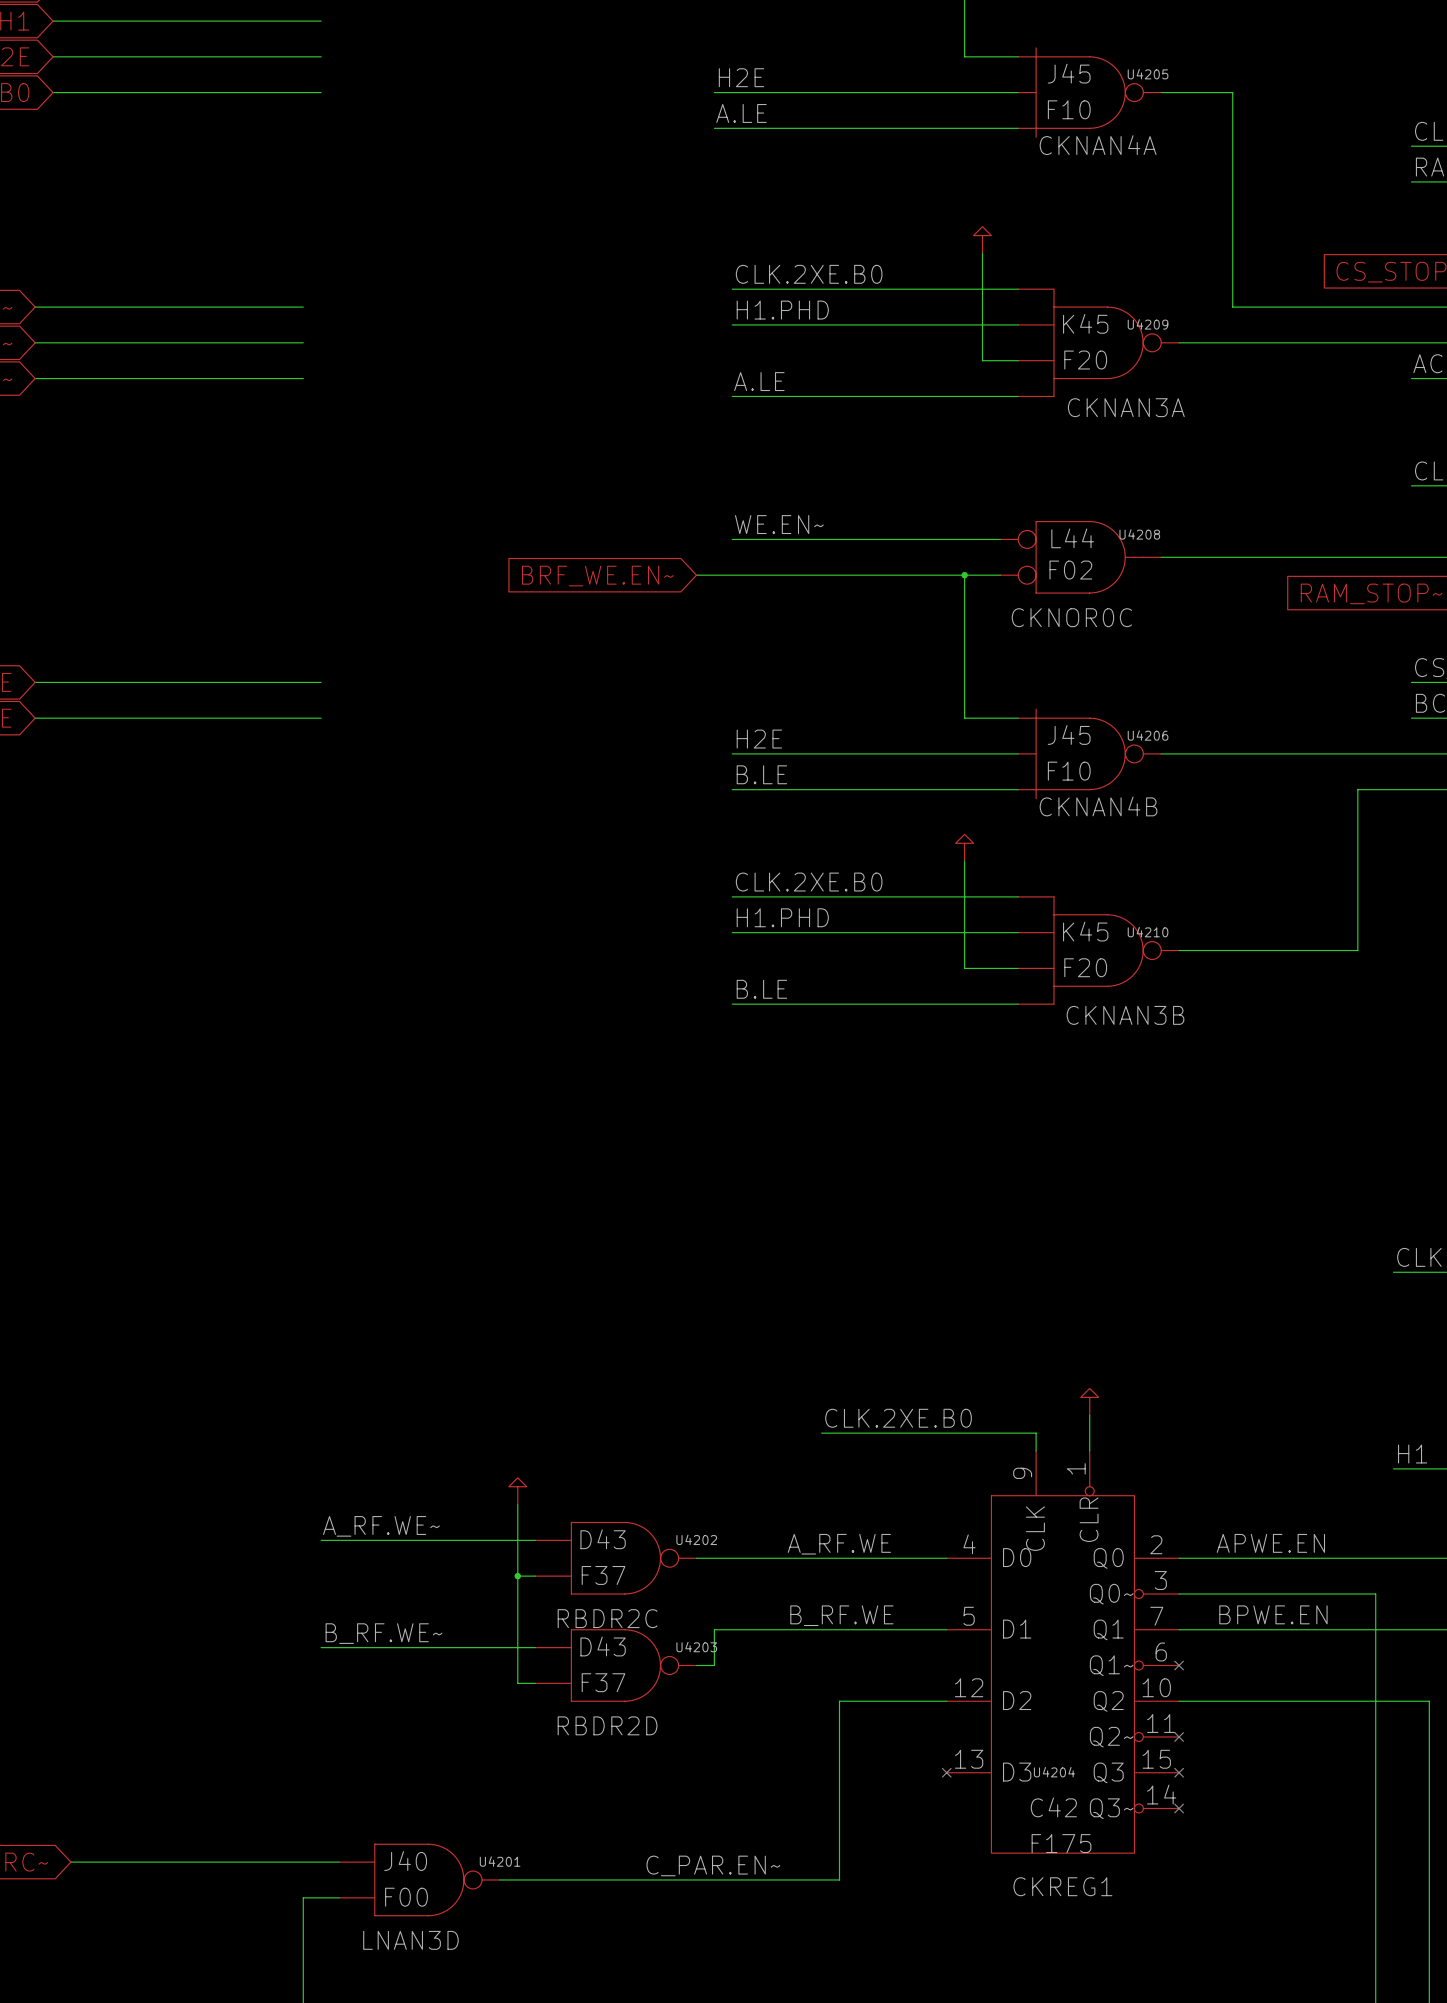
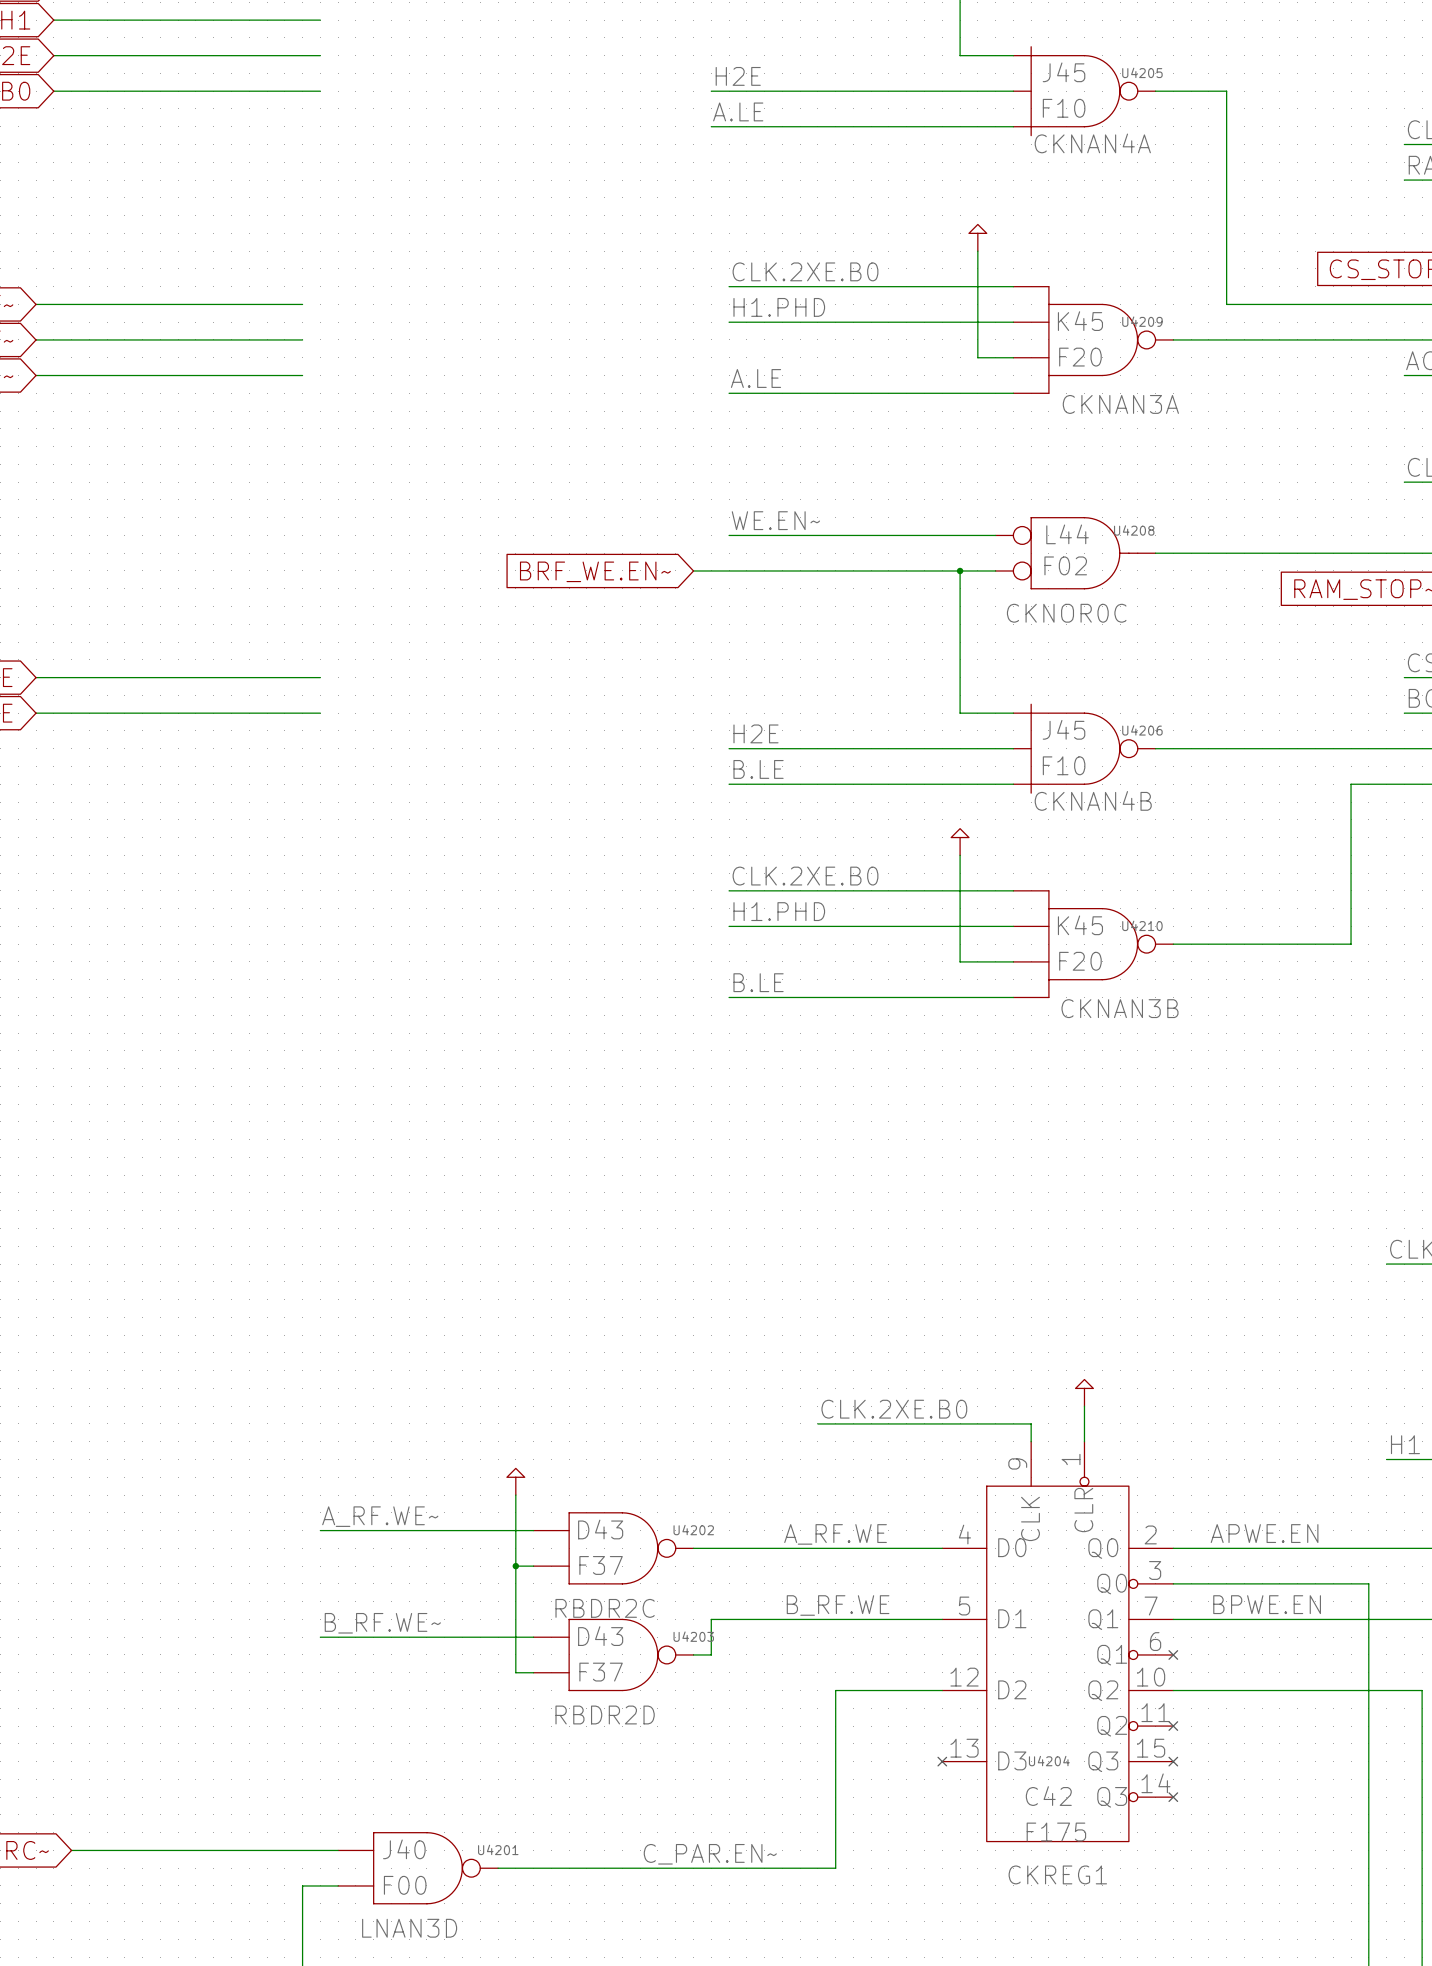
U4204 pin name: Q0~ (1111, 1594) -> Q0 (1112, 1584)
U4204 pin name: Q1~ (1111, 1665) -> Q1 (1112, 1655)
U4204 pin name: Q2~ (1111, 1737) -> Q2 (1112, 1726)
U4204 pin name: Q3~ (1111, 1808) -> Q3 (1112, 1797)

